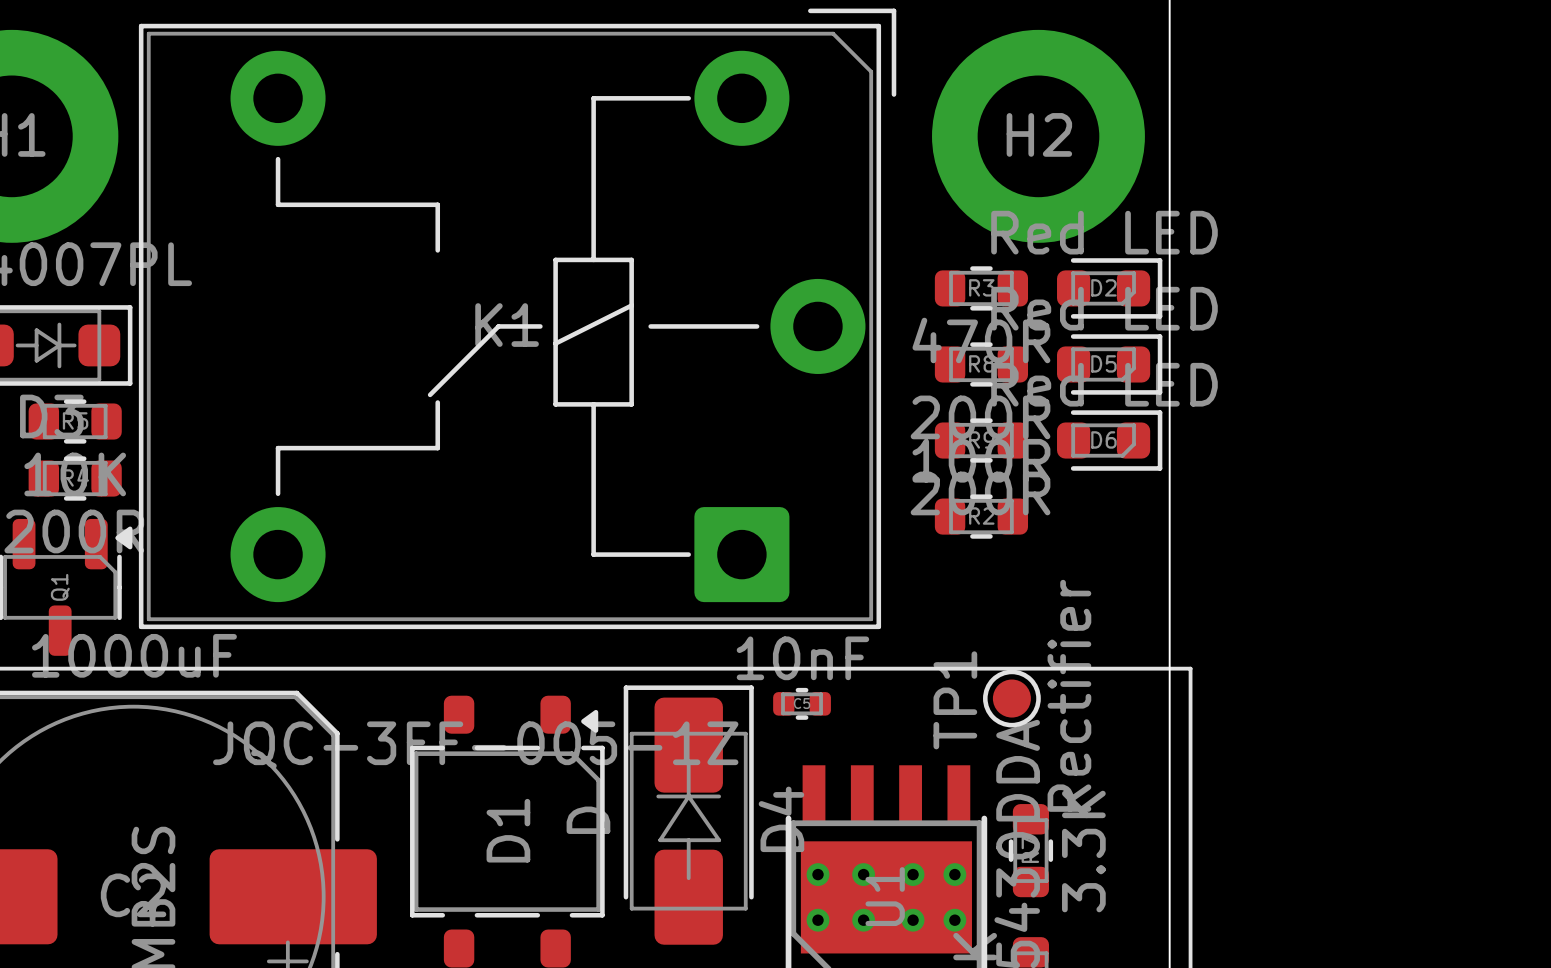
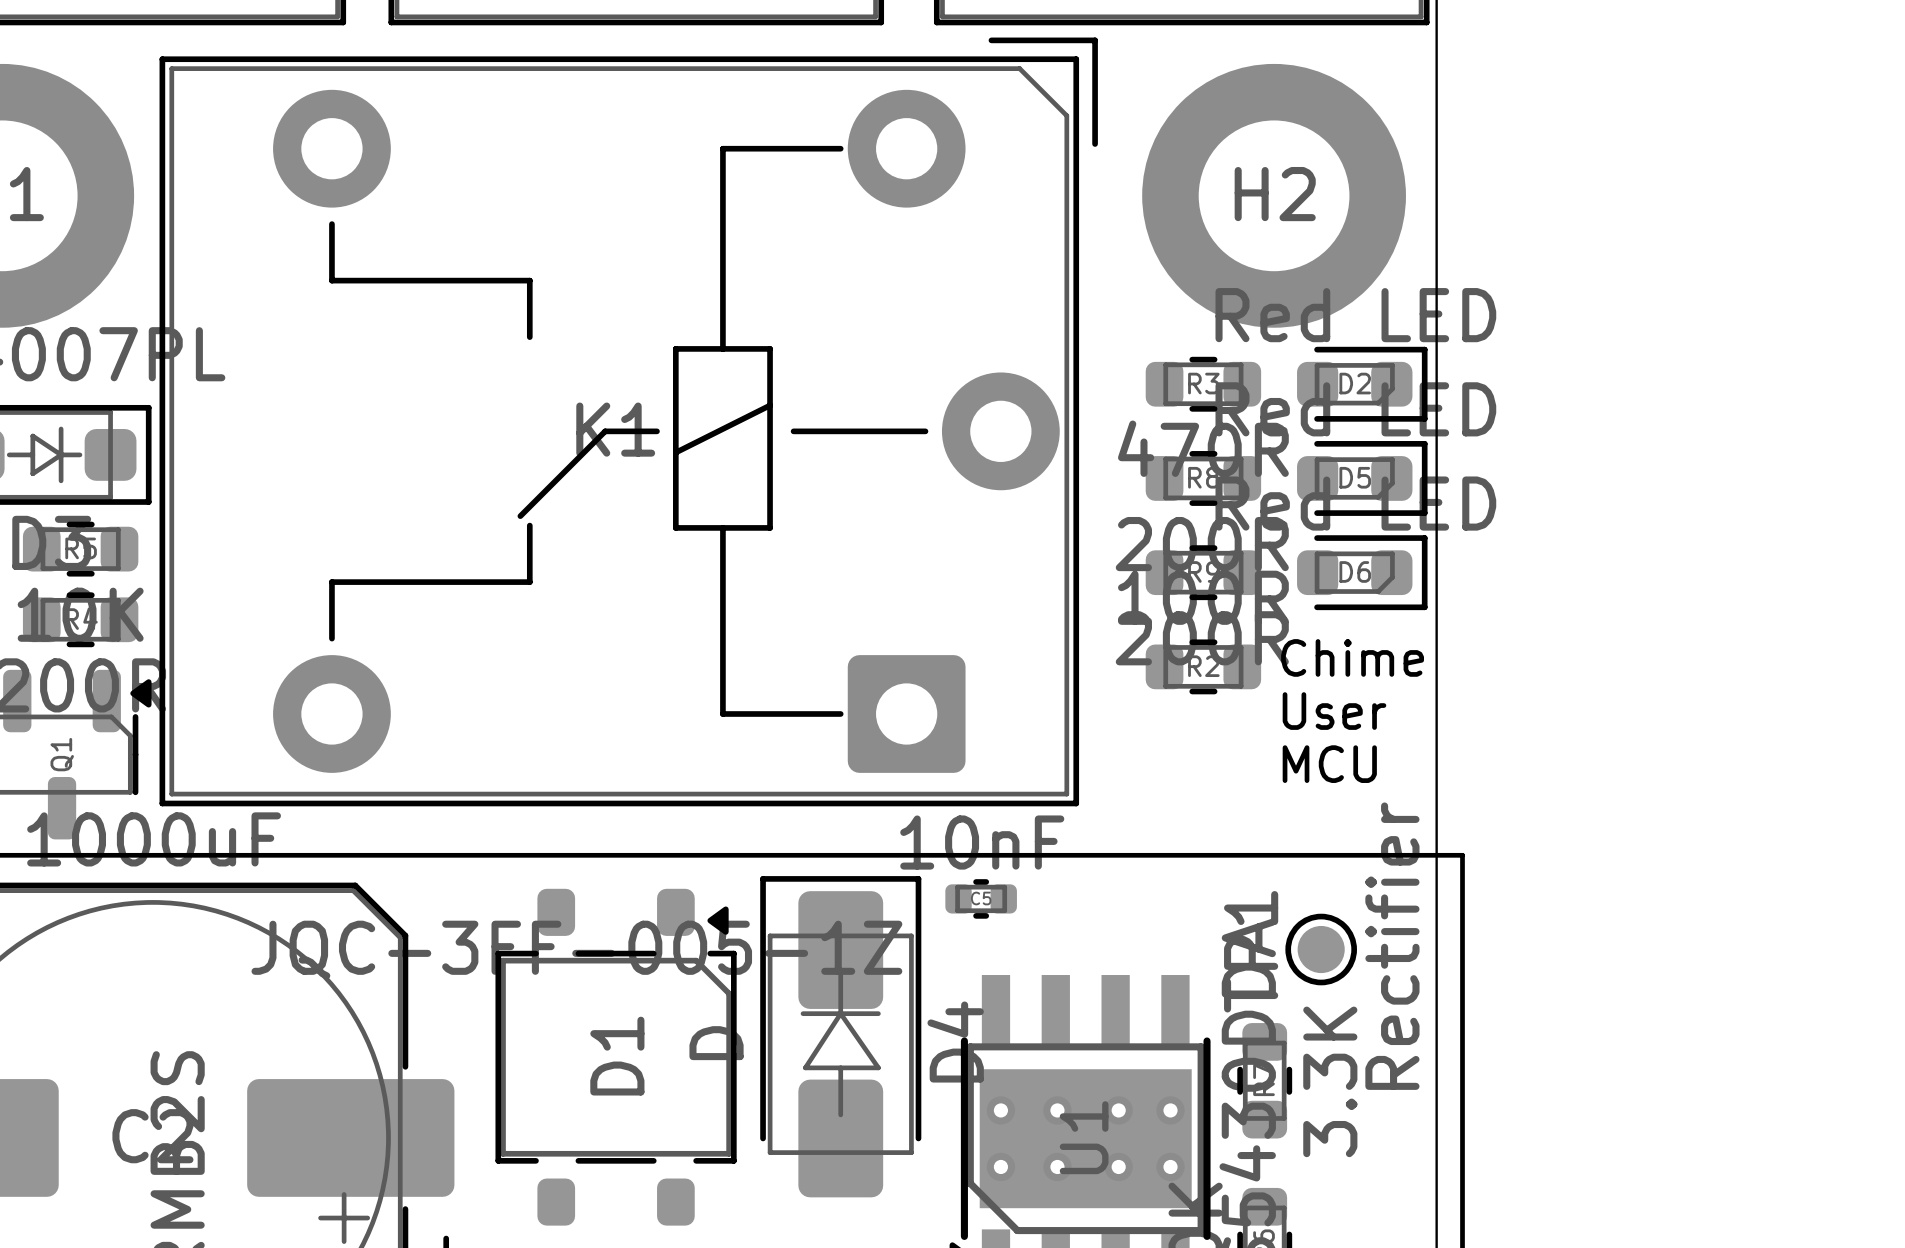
text: none -> Chime (1352, 657)
text: none -> User (1334, 711)
text: none -> MCU (1329, 764)
TP1 position: (1011, 698) -> (1321, 949)

